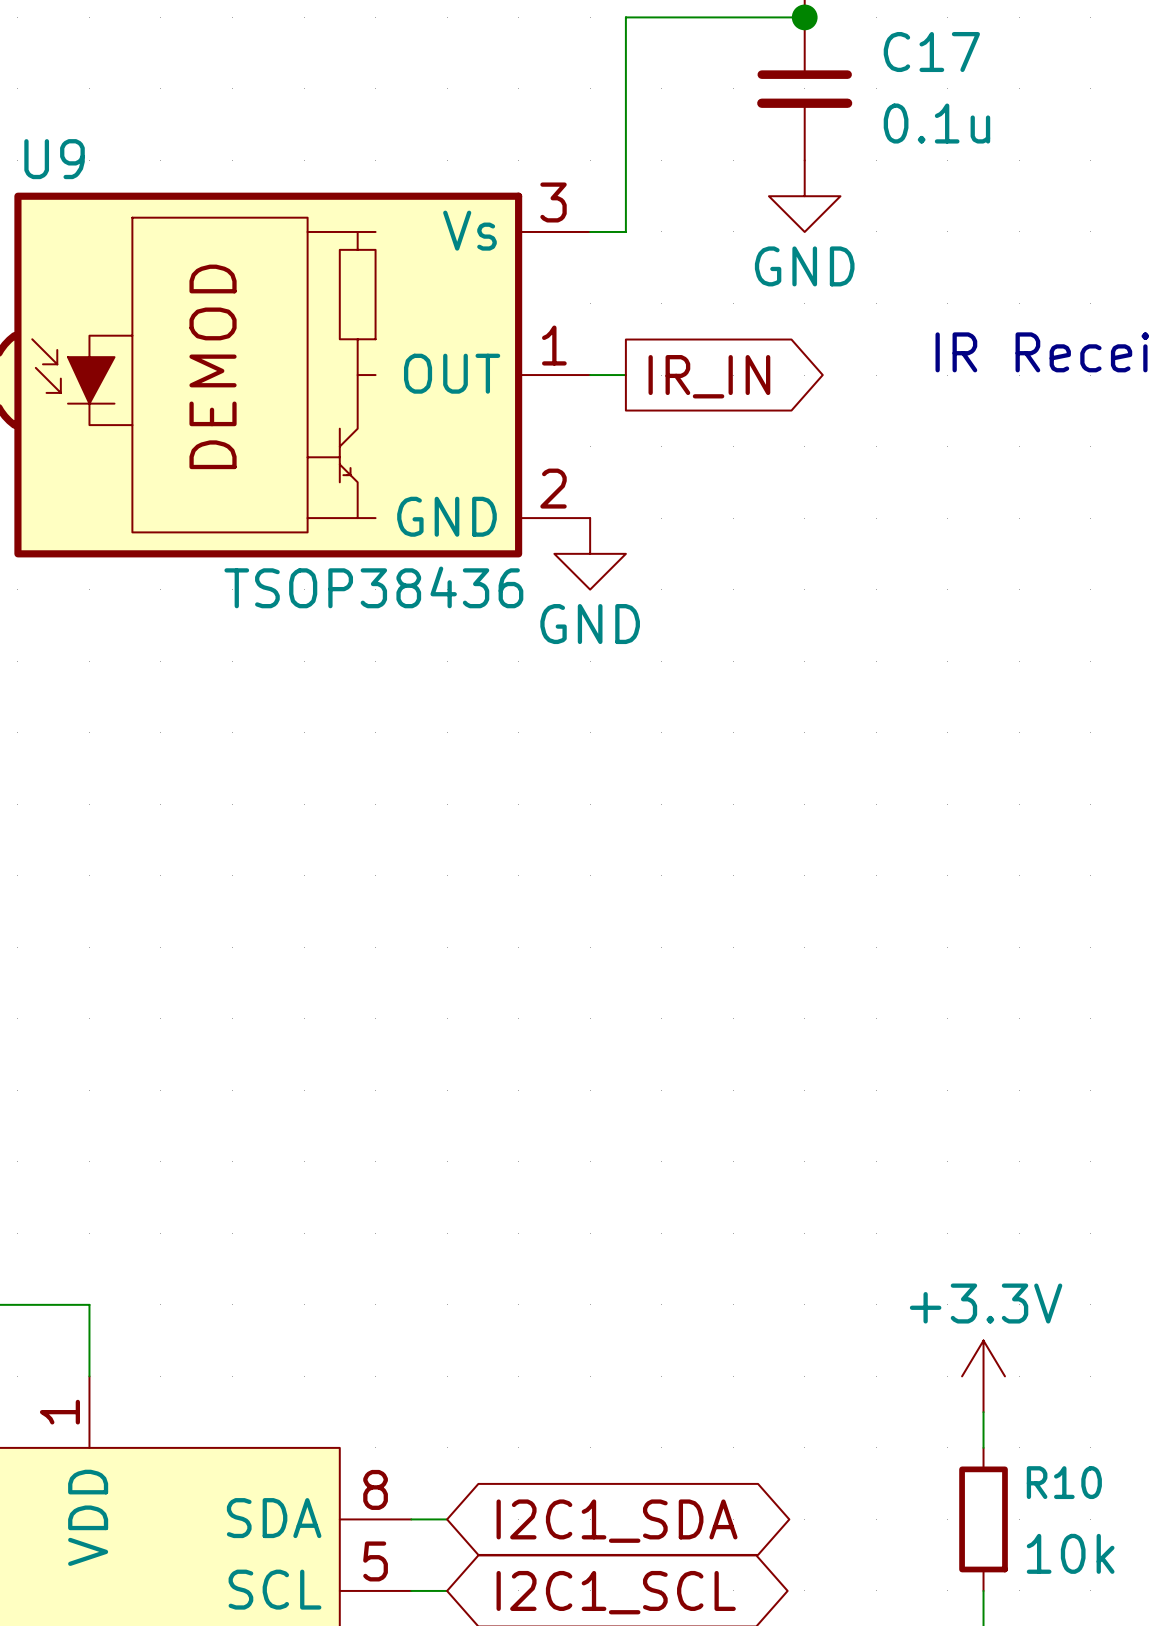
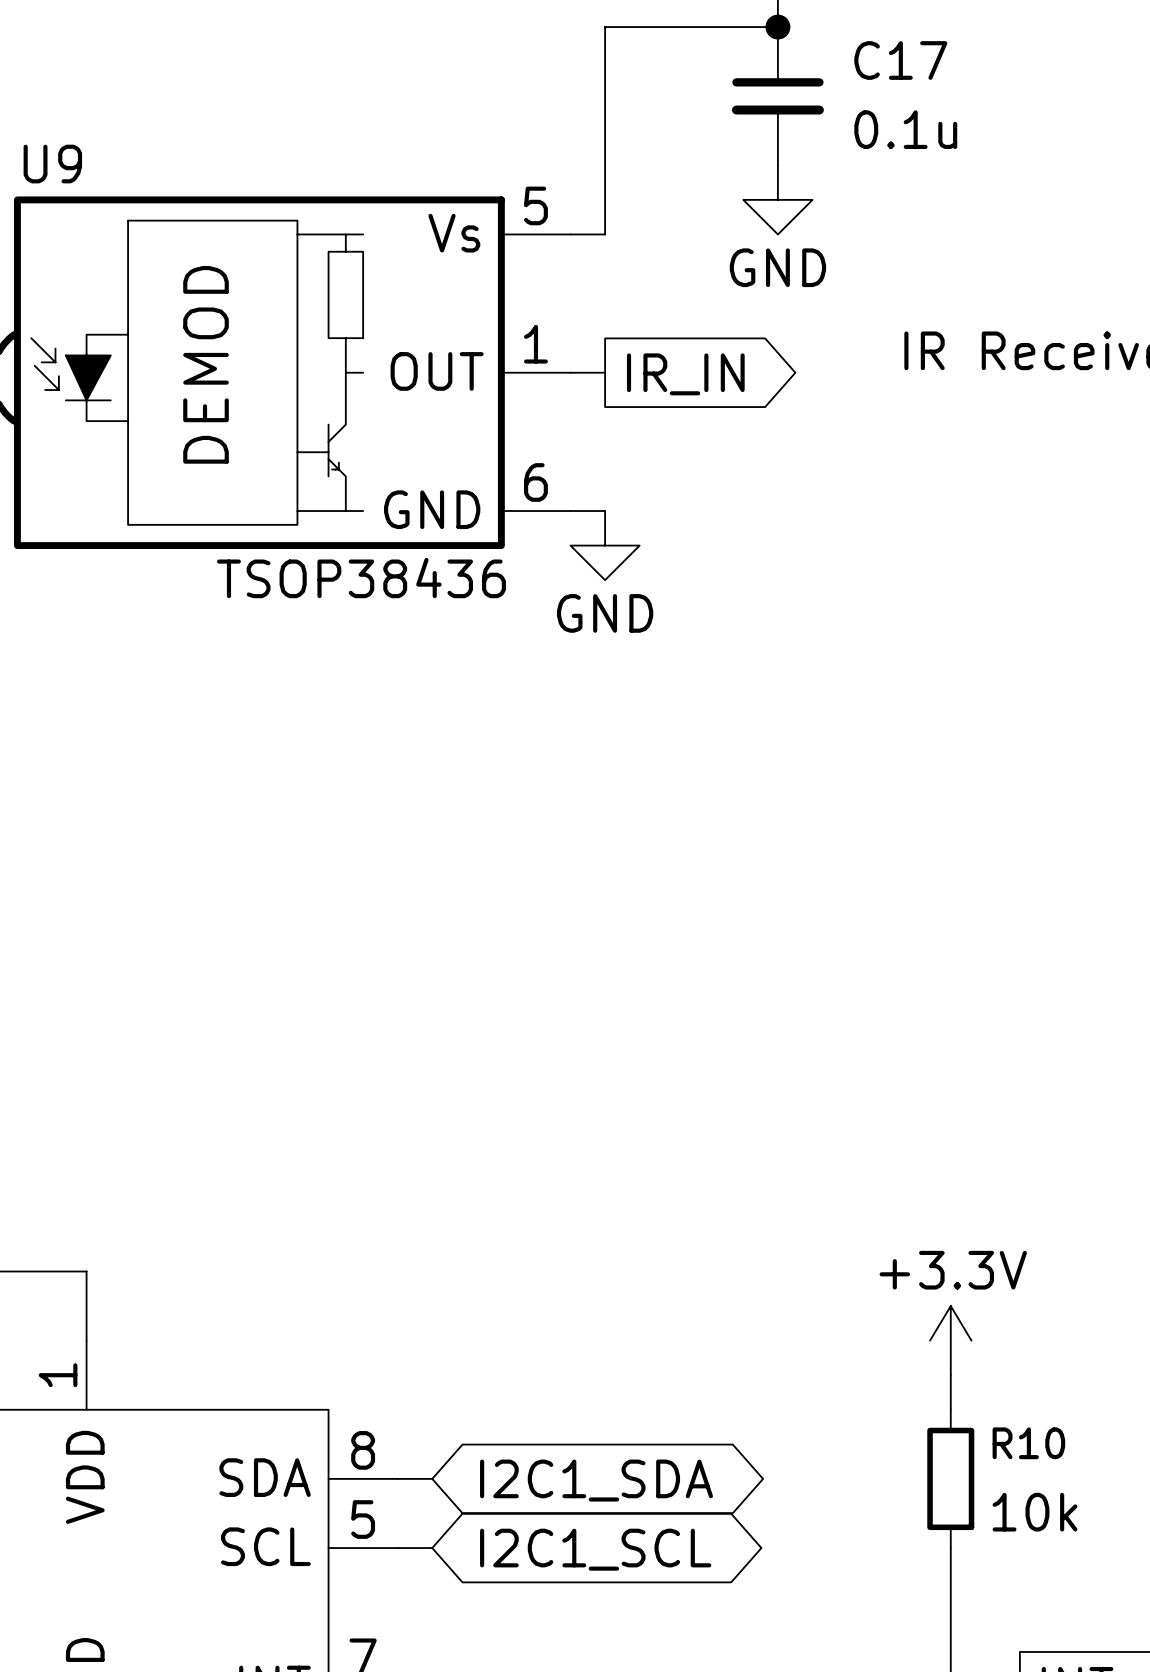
U9 pin number: 3 (553, 202) -> 5 (535, 205)
U9 pin number: 2 (553, 488) -> 6 (535, 482)
wire: none -> (570, 511) (605, 511)
power symbol position: GND (590, 553) -> GND (605, 545)

